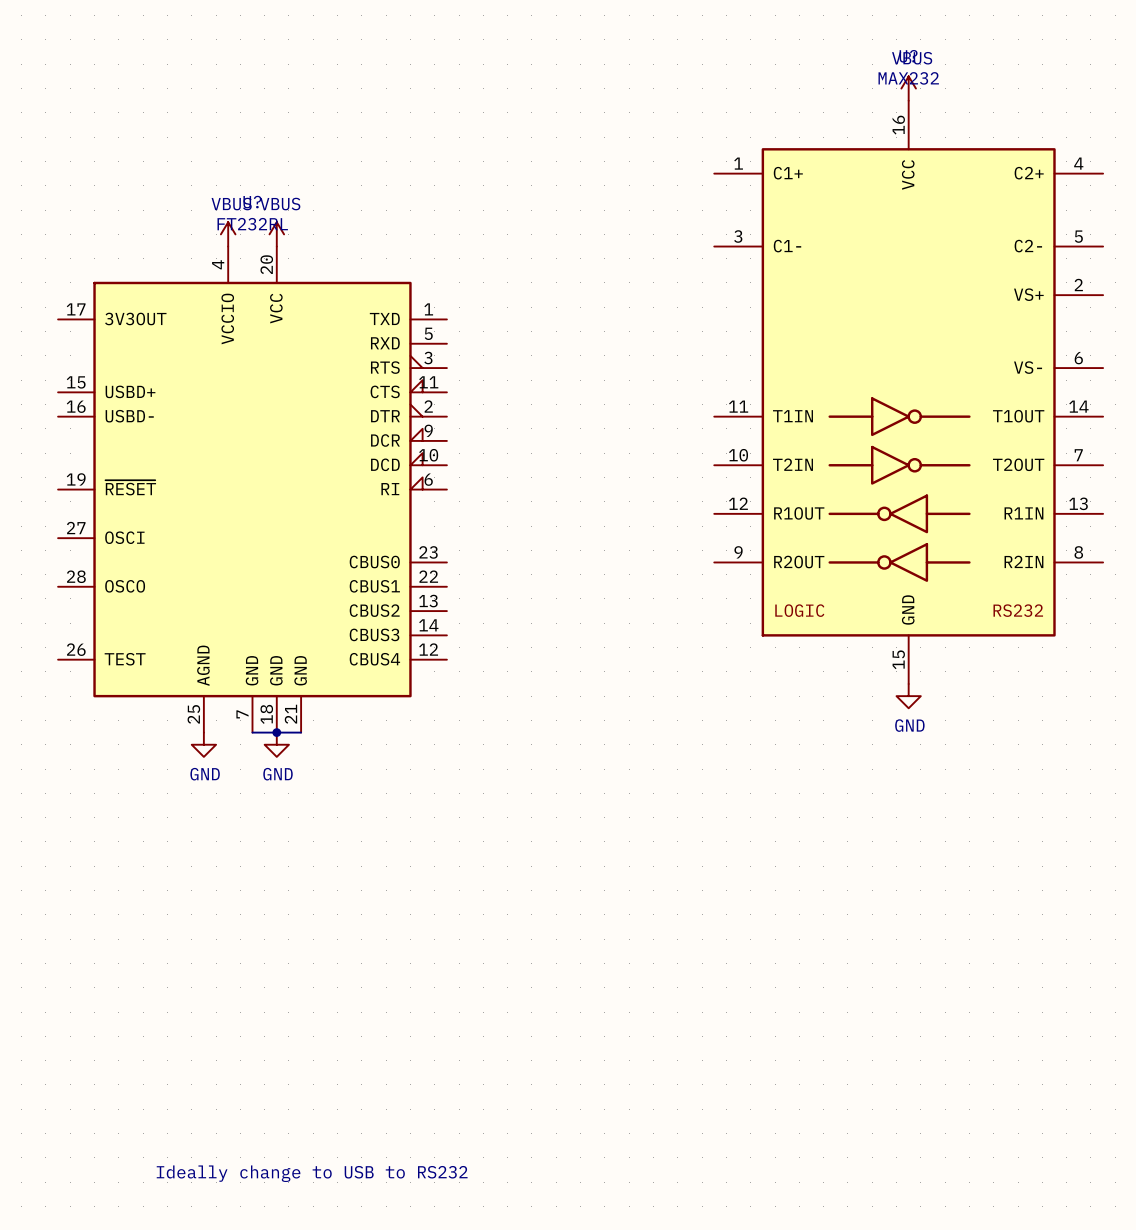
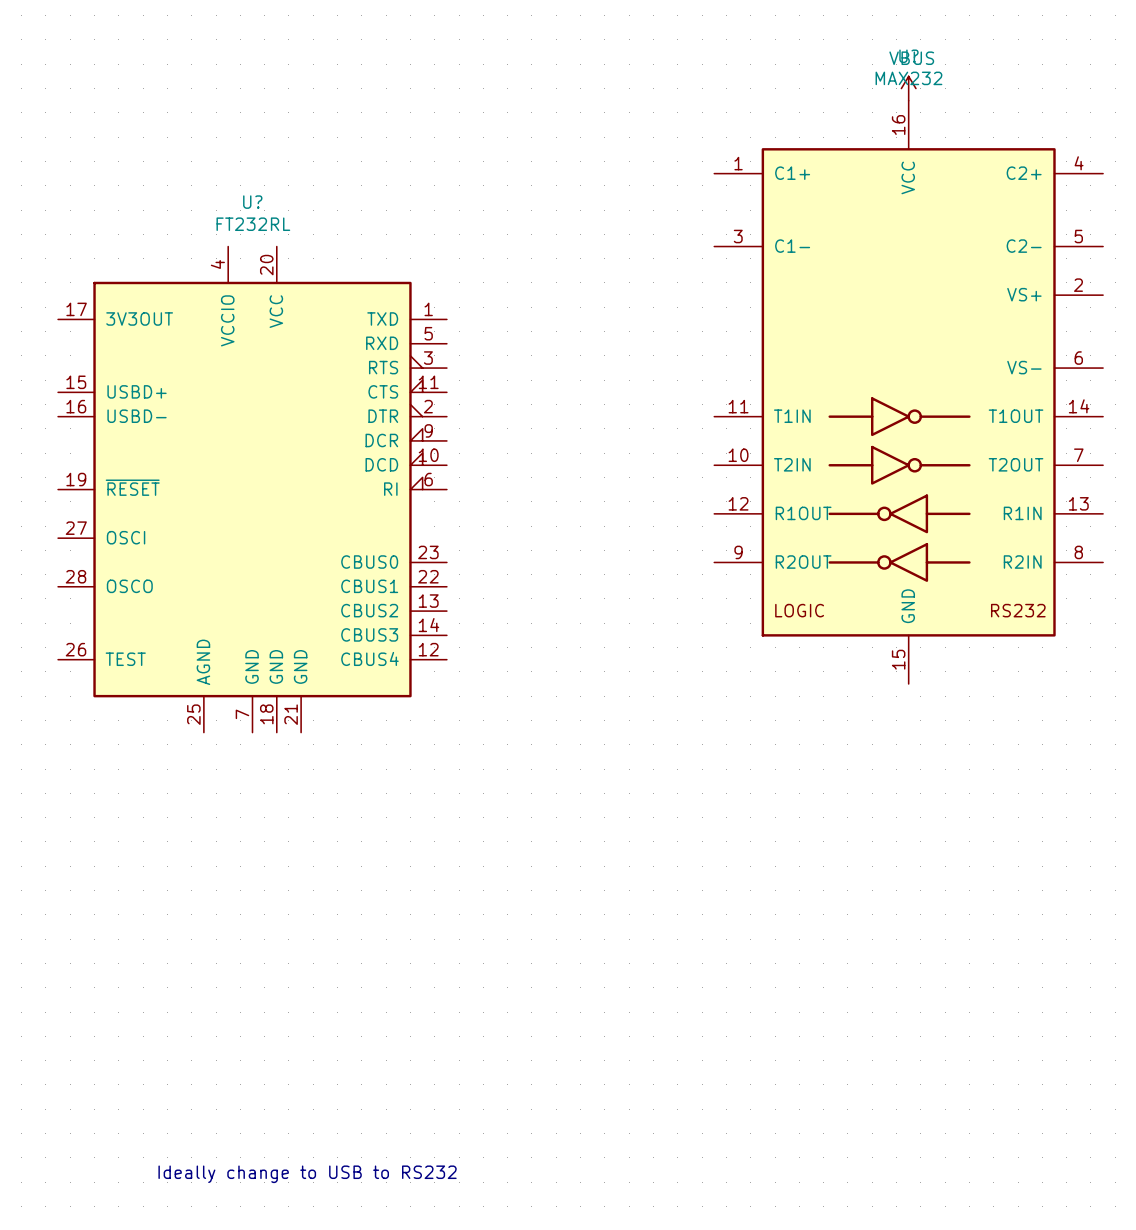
power symbol: VBUS (228, 234) -> none
power symbol: VBUS (276, 234) -> none
power symbol: GND (908, 696) -> none
wire: (252, 732) (301, 732) -> none
junction: (276, 732) -> none
power symbol: GND (203, 744) -> none
power symbol: GND (276, 744) -> none

